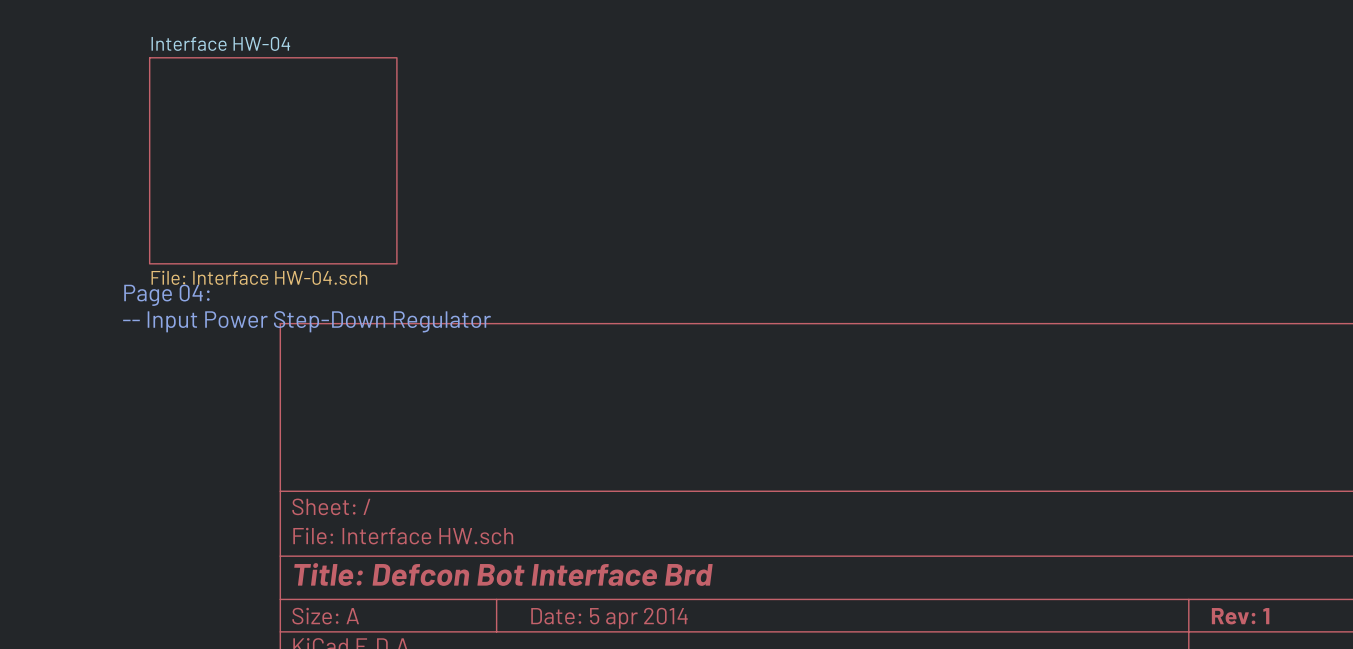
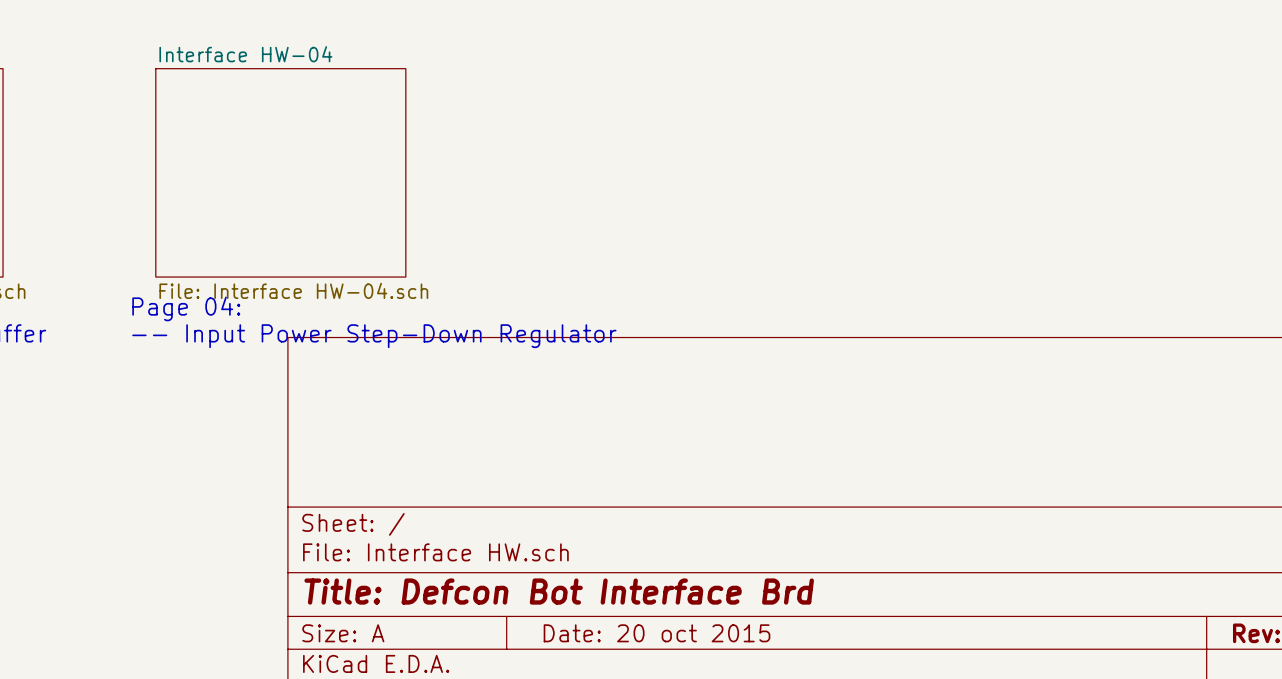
title block: Date: 5 apr 2014 (609, 618) -> Date: 20 oct 2015 (657, 633)

